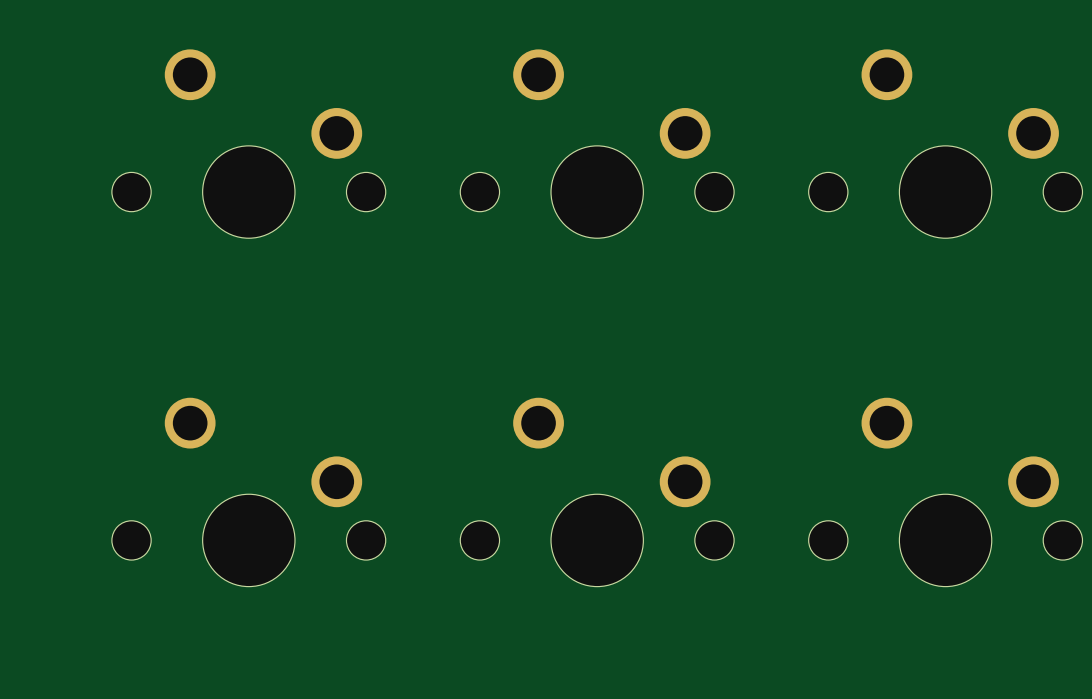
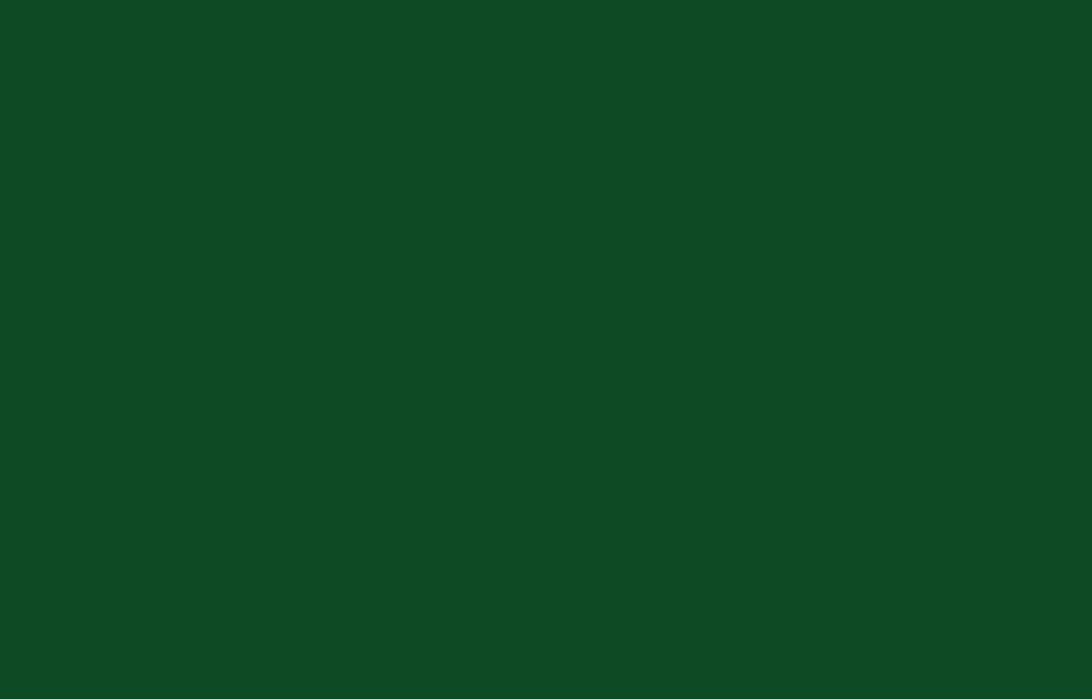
part: (248, 143) -> none
part: (597, 143) -> none
part: (945, 143) -> none
part: (248, 492) -> none
part: (597, 492) -> none
part: (945, 492) -> none

